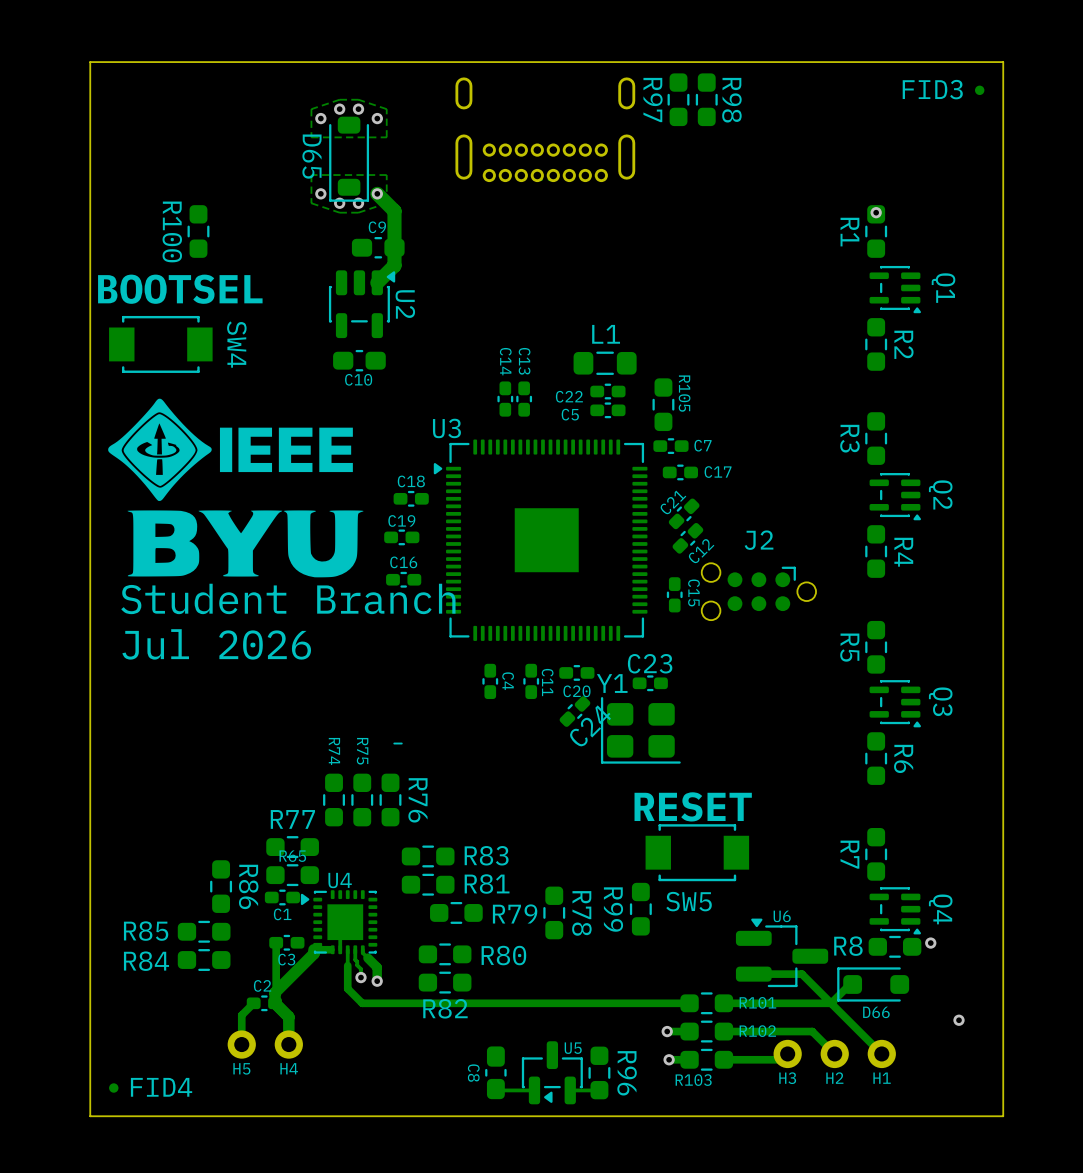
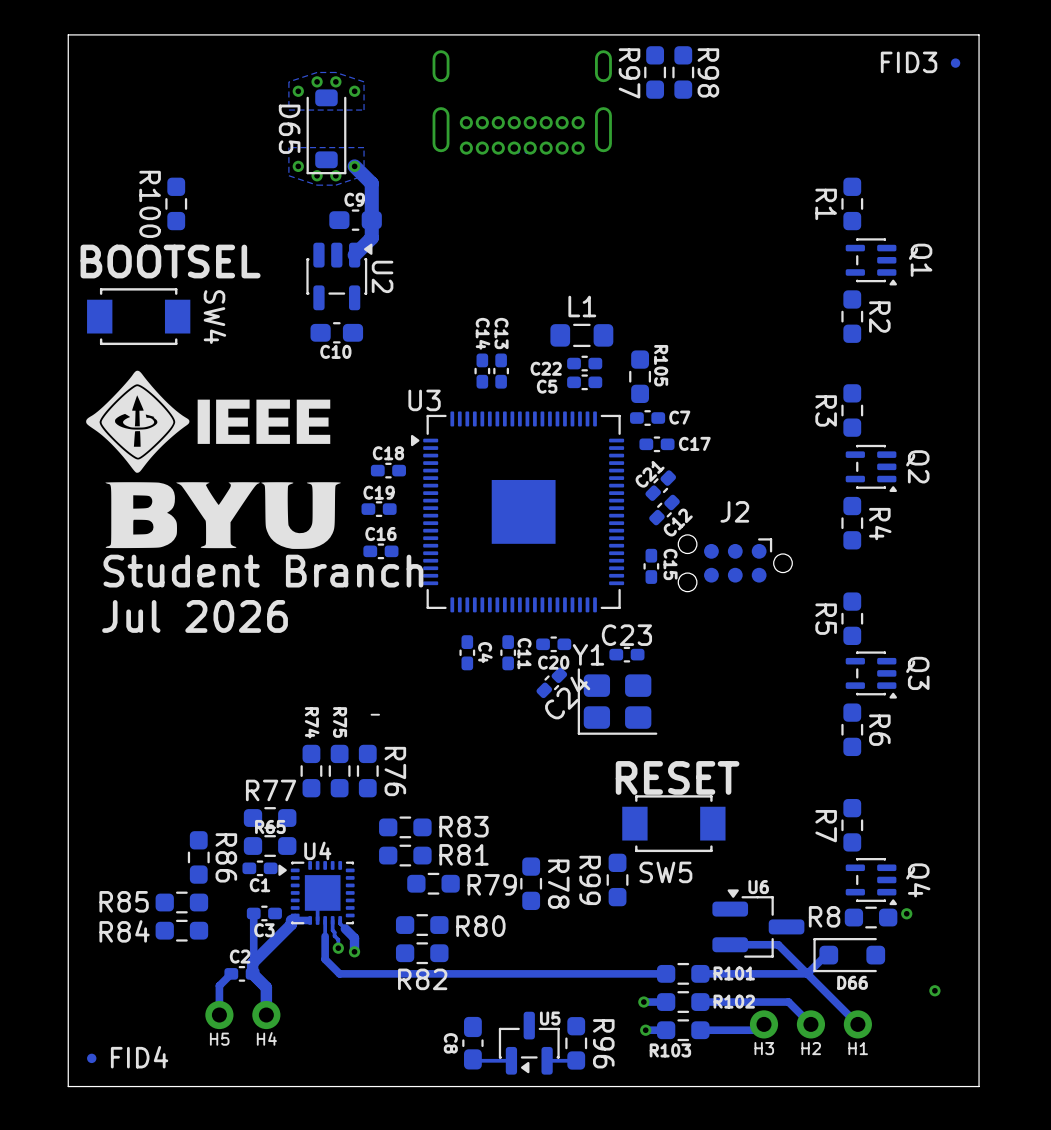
via: (876, 212) -> none

